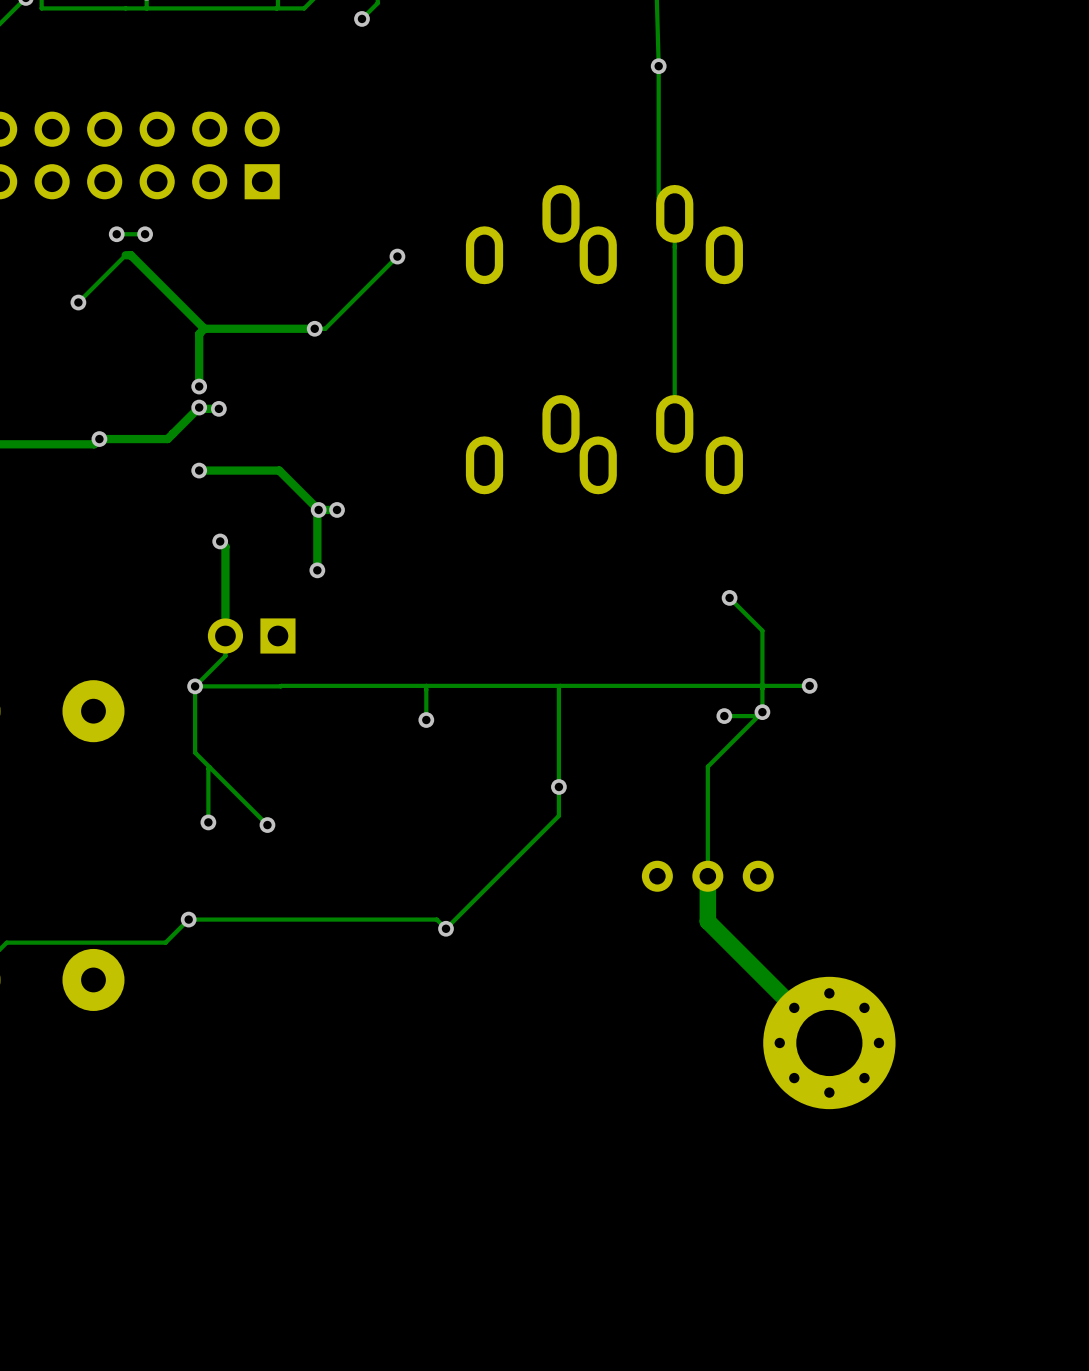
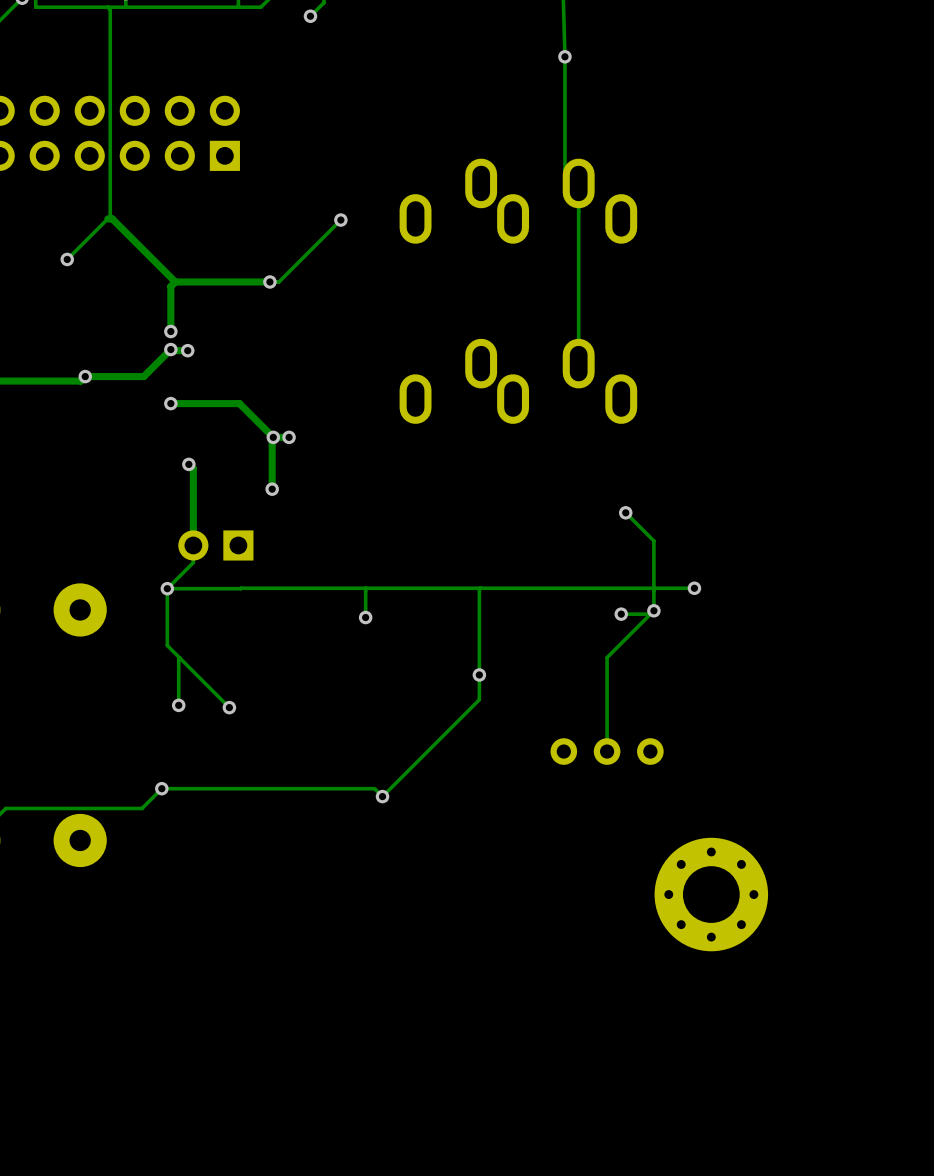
track: none -> (107, 7) (110, 9) (110, 216) (107, 218)
via: (116, 234) -> none
track: (145, 234) (116, 234) -> none
via: (145, 234) -> none
track: (707, 876) (707, 921) (829, 1042) -> none

